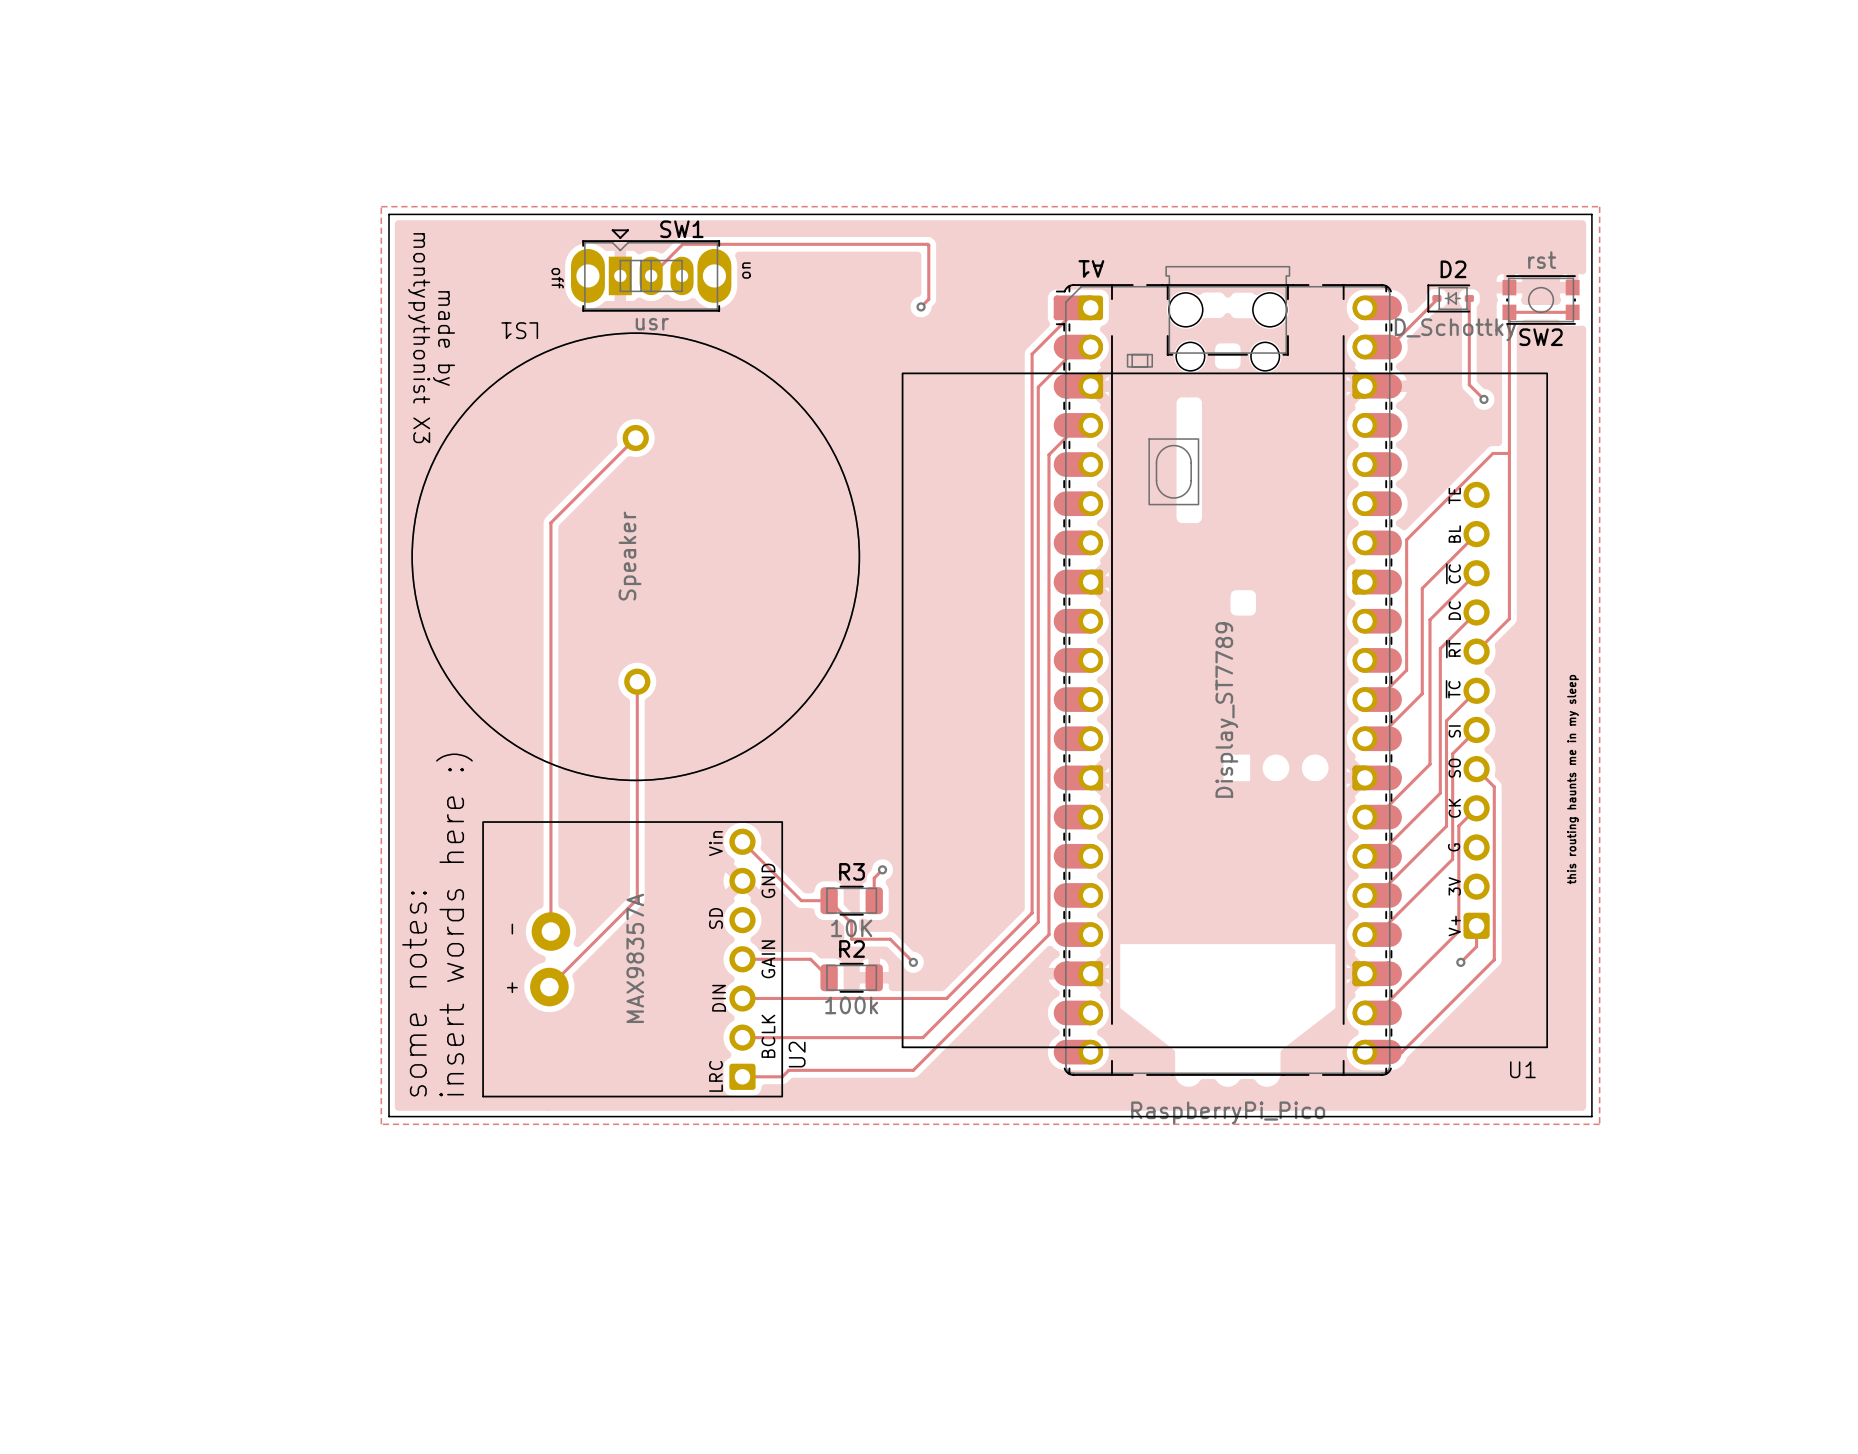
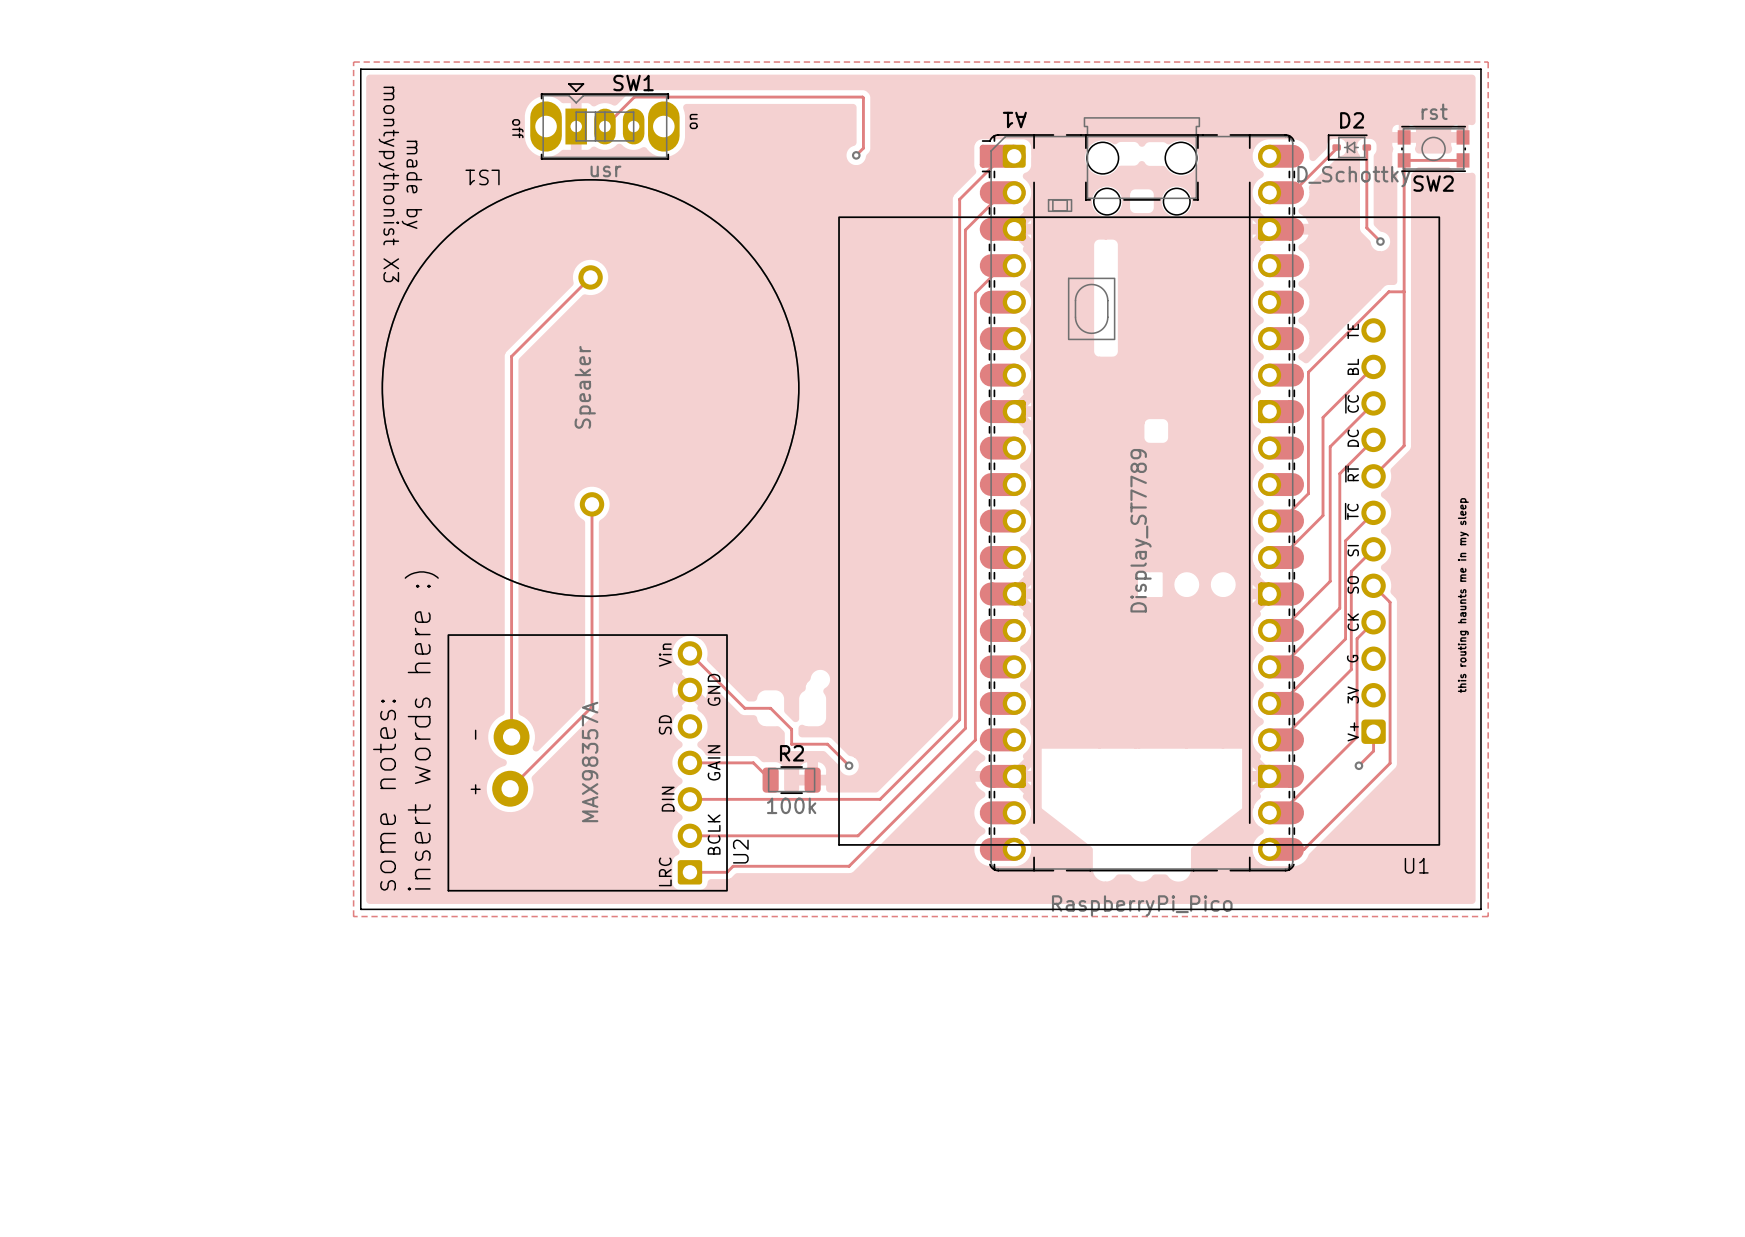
track: (882, 869) (874, 878) (874, 900) -> none
via: (882, 869) -> none
R3: 10K (851, 900) -> none

